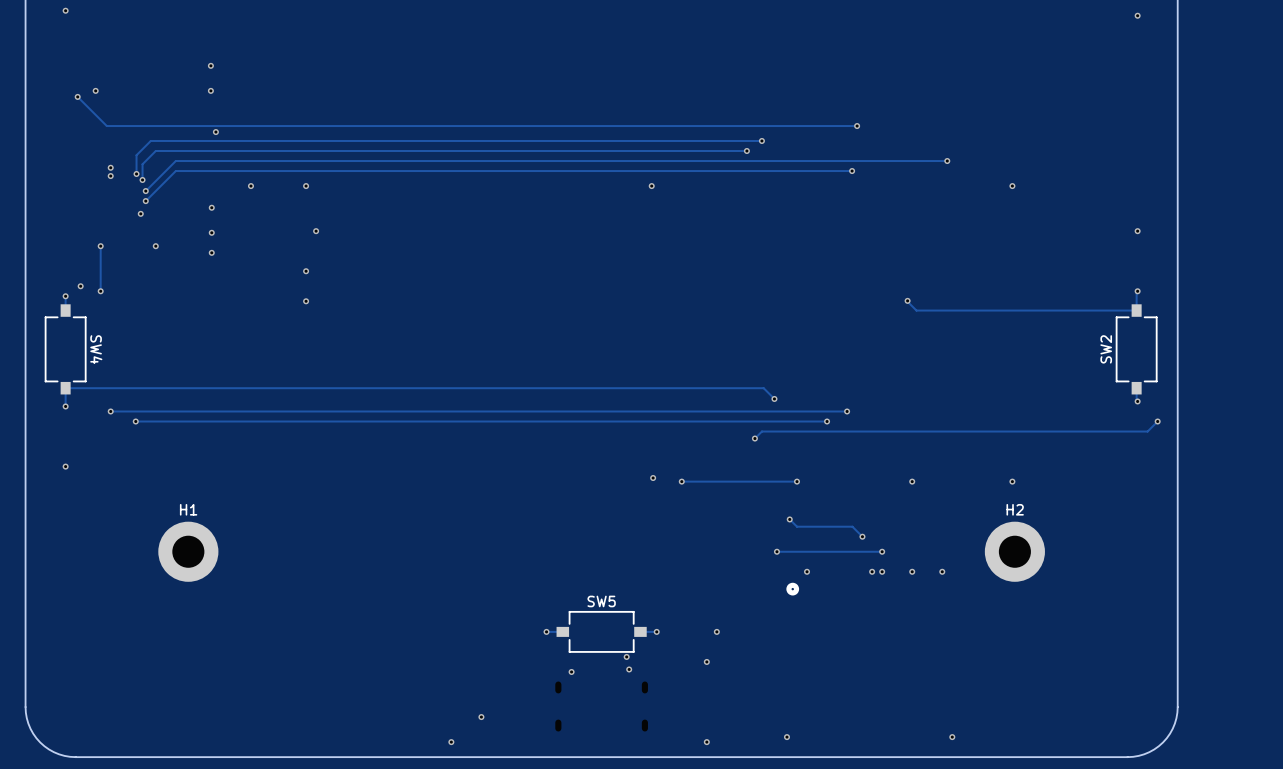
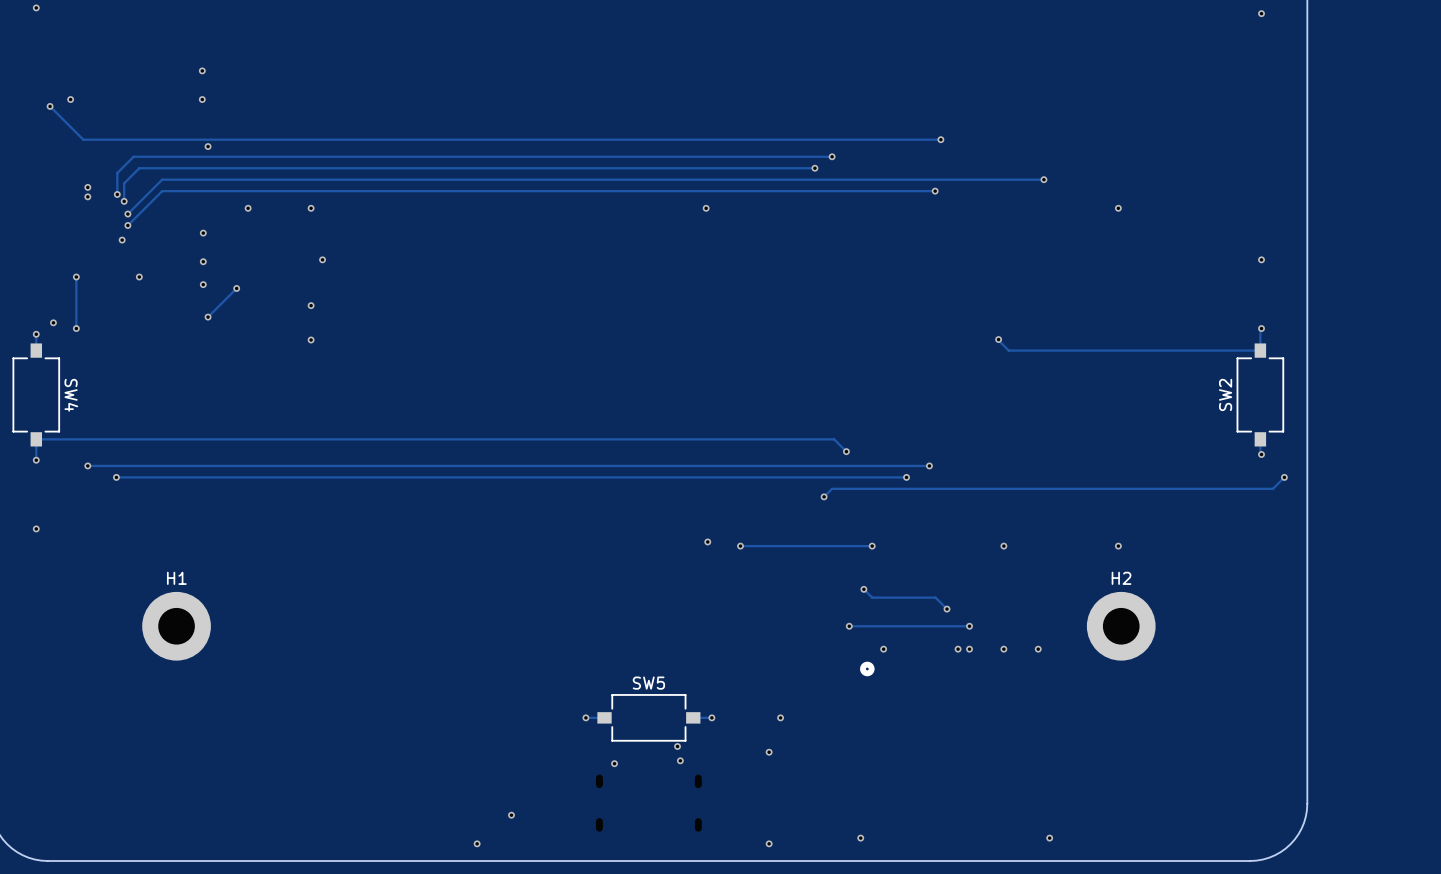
track: none -> (236, 288) (208, 317)
via: none -> (236, 288)
via: none -> (208, 317)

